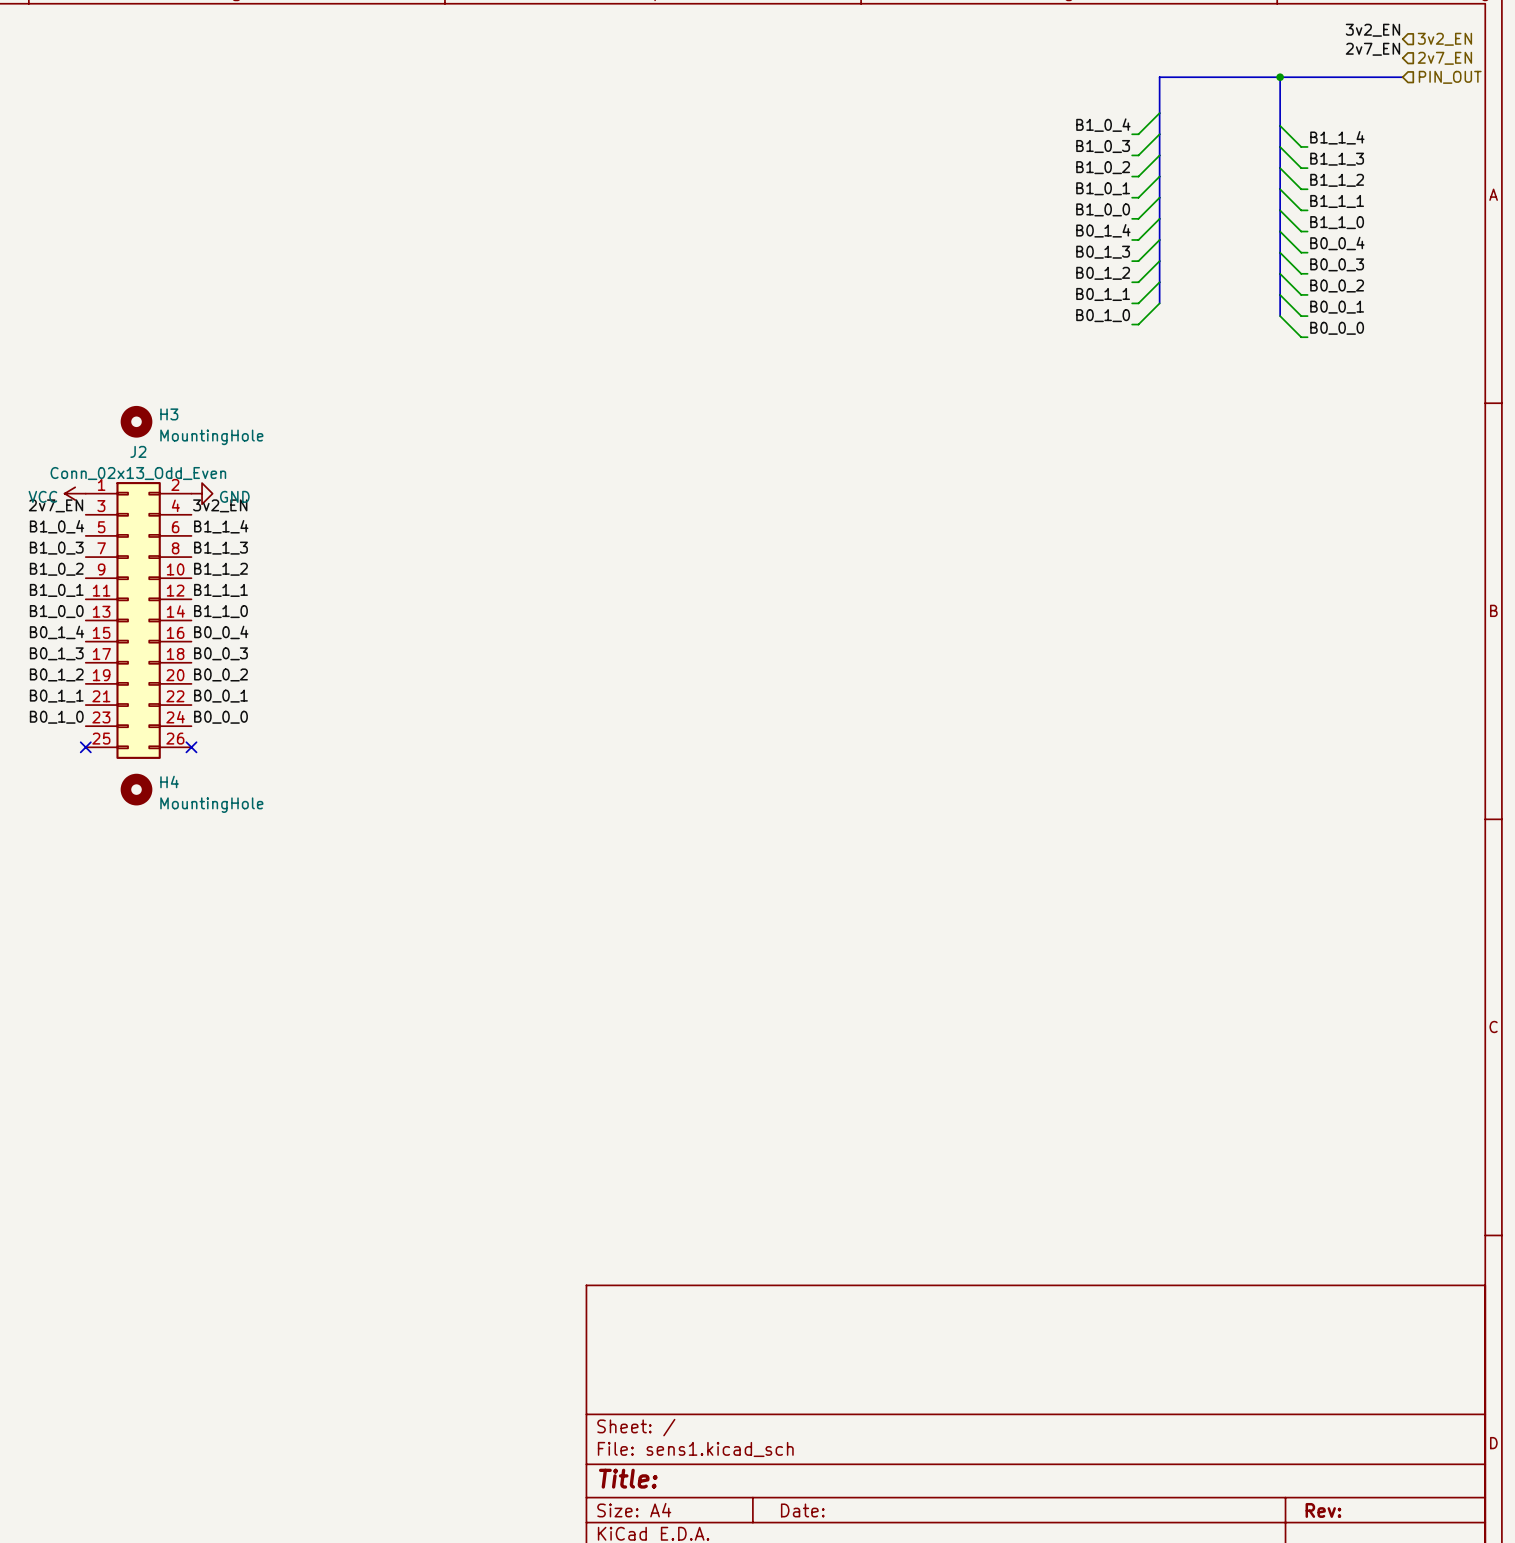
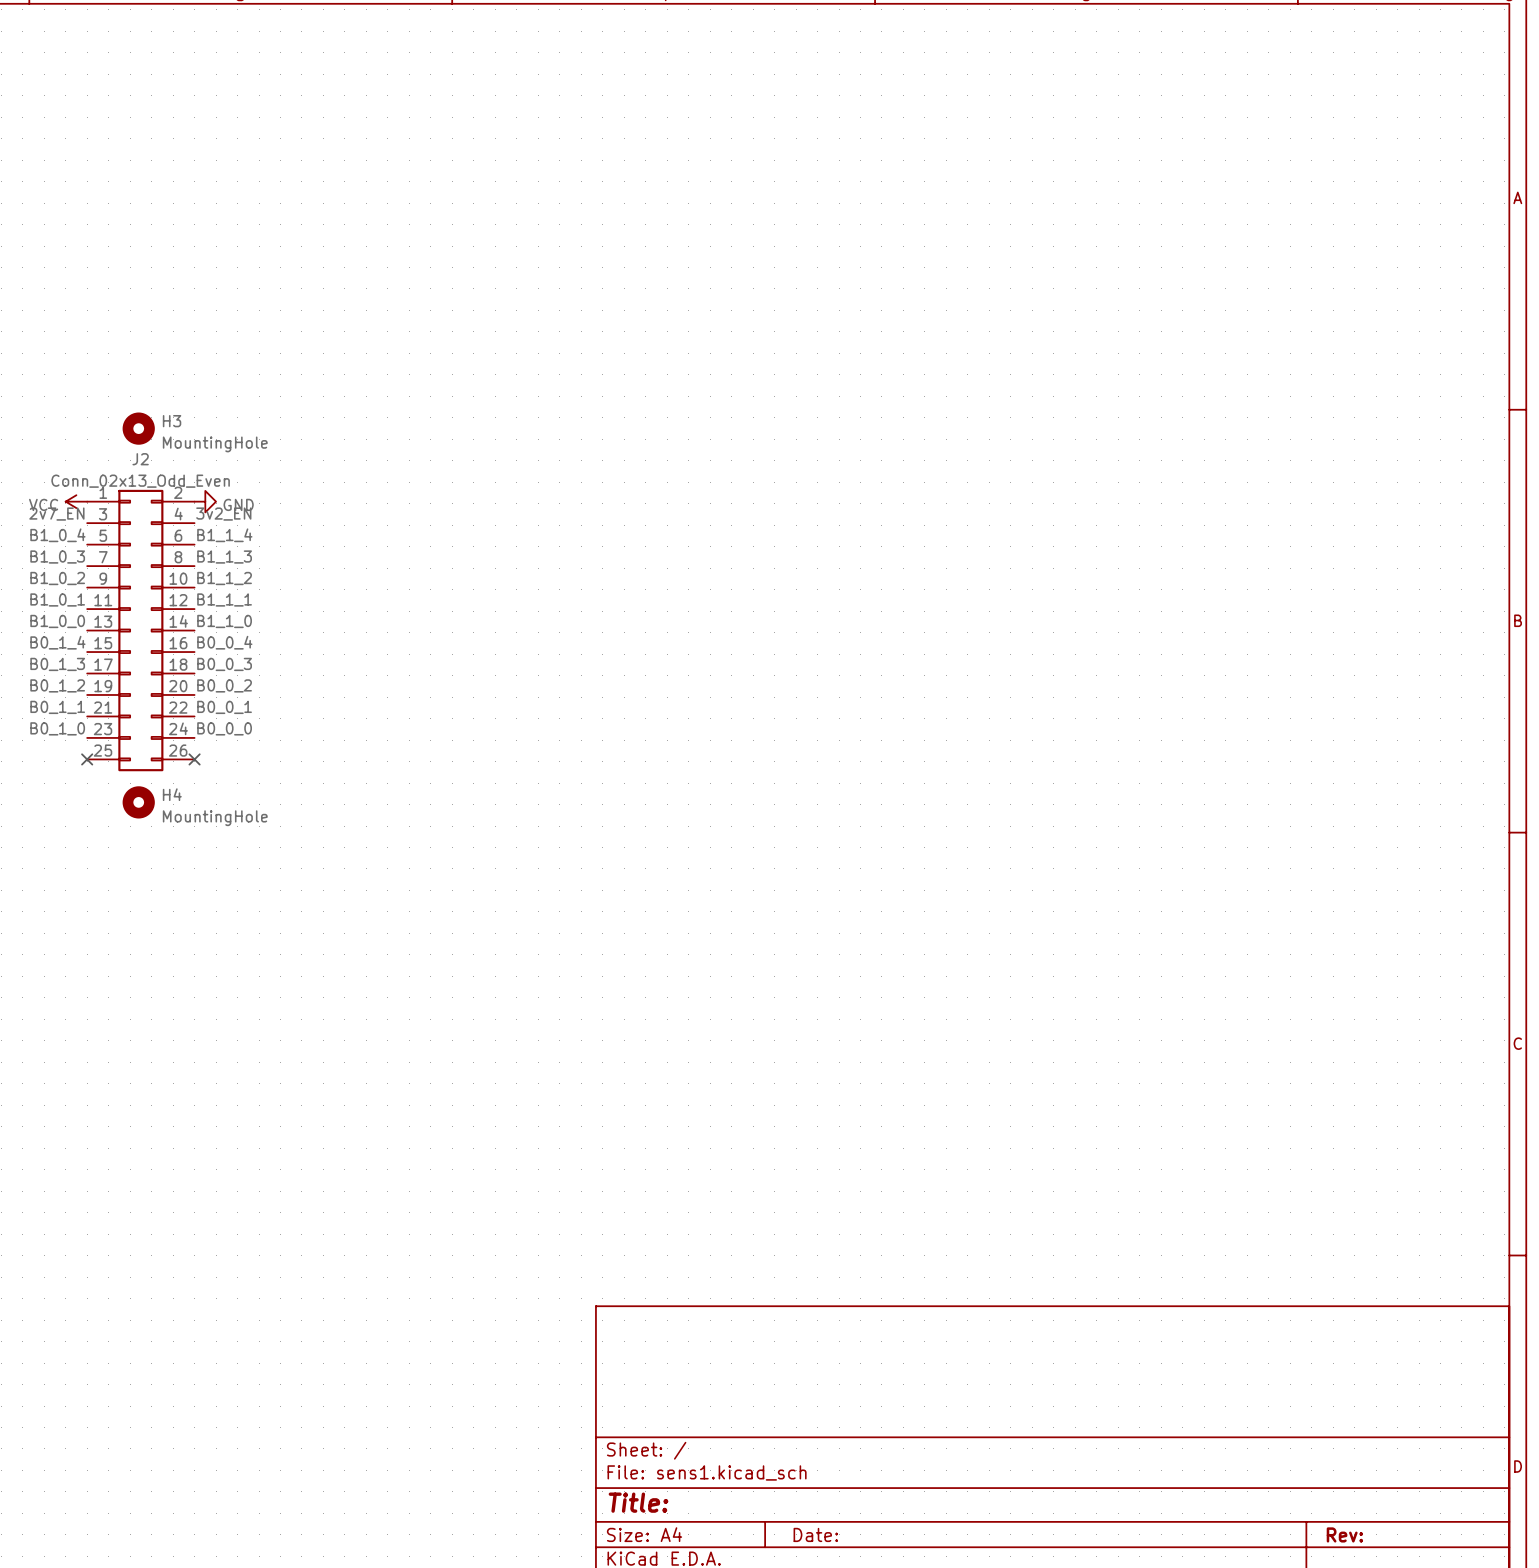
label: 3v2_EN (1372, 30) -> none
hierarchical label: 3v2_EN (1444, 39) -> none
label: 2v7_EN (1372, 49) -> none
hierarchical label: 2v7_EN (1444, 58) -> none
bus: (1280, 77) (1280, 316) -> none
junction: (1280, 77) -> none
bus: (1402, 77) (1159, 77) (1159, 303) -> none
hierarchical label: PIN_OUT (1450, 77) -> none
wire: (1159, 113) (1138, 134) (1132, 134) -> none
label: B1_0_4 (1103, 125) -> none
wire: (1280, 125) (1301, 146) (1307, 146) -> none
wire: (1159, 134) (1138, 155) (1132, 155) -> none
label: B1_1_4 (1337, 137) -> none
label: B1_0_3 (1103, 146) -> none
wire: (1280, 146) (1301, 168) (1307, 168) -> none
wire: (1159, 155) (1138, 176) (1132, 176) -> none
label: B1_1_3 (1337, 159) -> none
label: B1_0_2 (1103, 167) -> none
wire: (1280, 168) (1301, 189) (1307, 189) -> none
wire: (1159, 176) (1138, 197) (1132, 197) -> none
label: B1_1_2 (1337, 180) -> none
label: B1_0_1 (1103, 188) -> none
wire: (1280, 189) (1301, 210) (1307, 210) -> none
wire: (1159, 197) (1138, 218) (1132, 218) -> none
label: B1_1_1 (1337, 201) -> none
label: B1_0_0 (1103, 209) -> none
wire: (1280, 210) (1301, 231) (1307, 231) -> none
wire: (1159, 218) (1138, 239) (1132, 239) -> none
label: B1_1_0 (1337, 222) -> none
label: B0_1_4 (1103, 230) -> none
wire: (1280, 231) (1301, 252) (1307, 252) -> none
wire: (1159, 239) (1138, 261) (1132, 261) -> none
label: B0_0_4 (1337, 243) -> none
label: B0_1_3 (1103, 252) -> none
wire: (1280, 252) (1301, 273) (1307, 273) -> none
wire: (1159, 261) (1138, 282) (1132, 282) -> none
label: B0_0_3 (1337, 264) -> none
label: B0_1_2 (1103, 273) -> none
wire: (1280, 273) (1301, 294) (1307, 294) -> none
wire: (1159, 282) (1138, 303) (1132, 303) -> none
label: B0_0_2 (1337, 286) -> none
label: B0_1_1 (1103, 294) -> none
wire: (1280, 294) (1301, 316) (1307, 316) -> none
wire: (1159, 303) (1138, 324) (1132, 324) -> none
label: B0_0_1 (1337, 307) -> none
label: B0_1_0 (1103, 315) -> none
wire: (1280, 316) (1301, 337) (1307, 337) -> none
label: B0_0_0 (1337, 328) -> none

